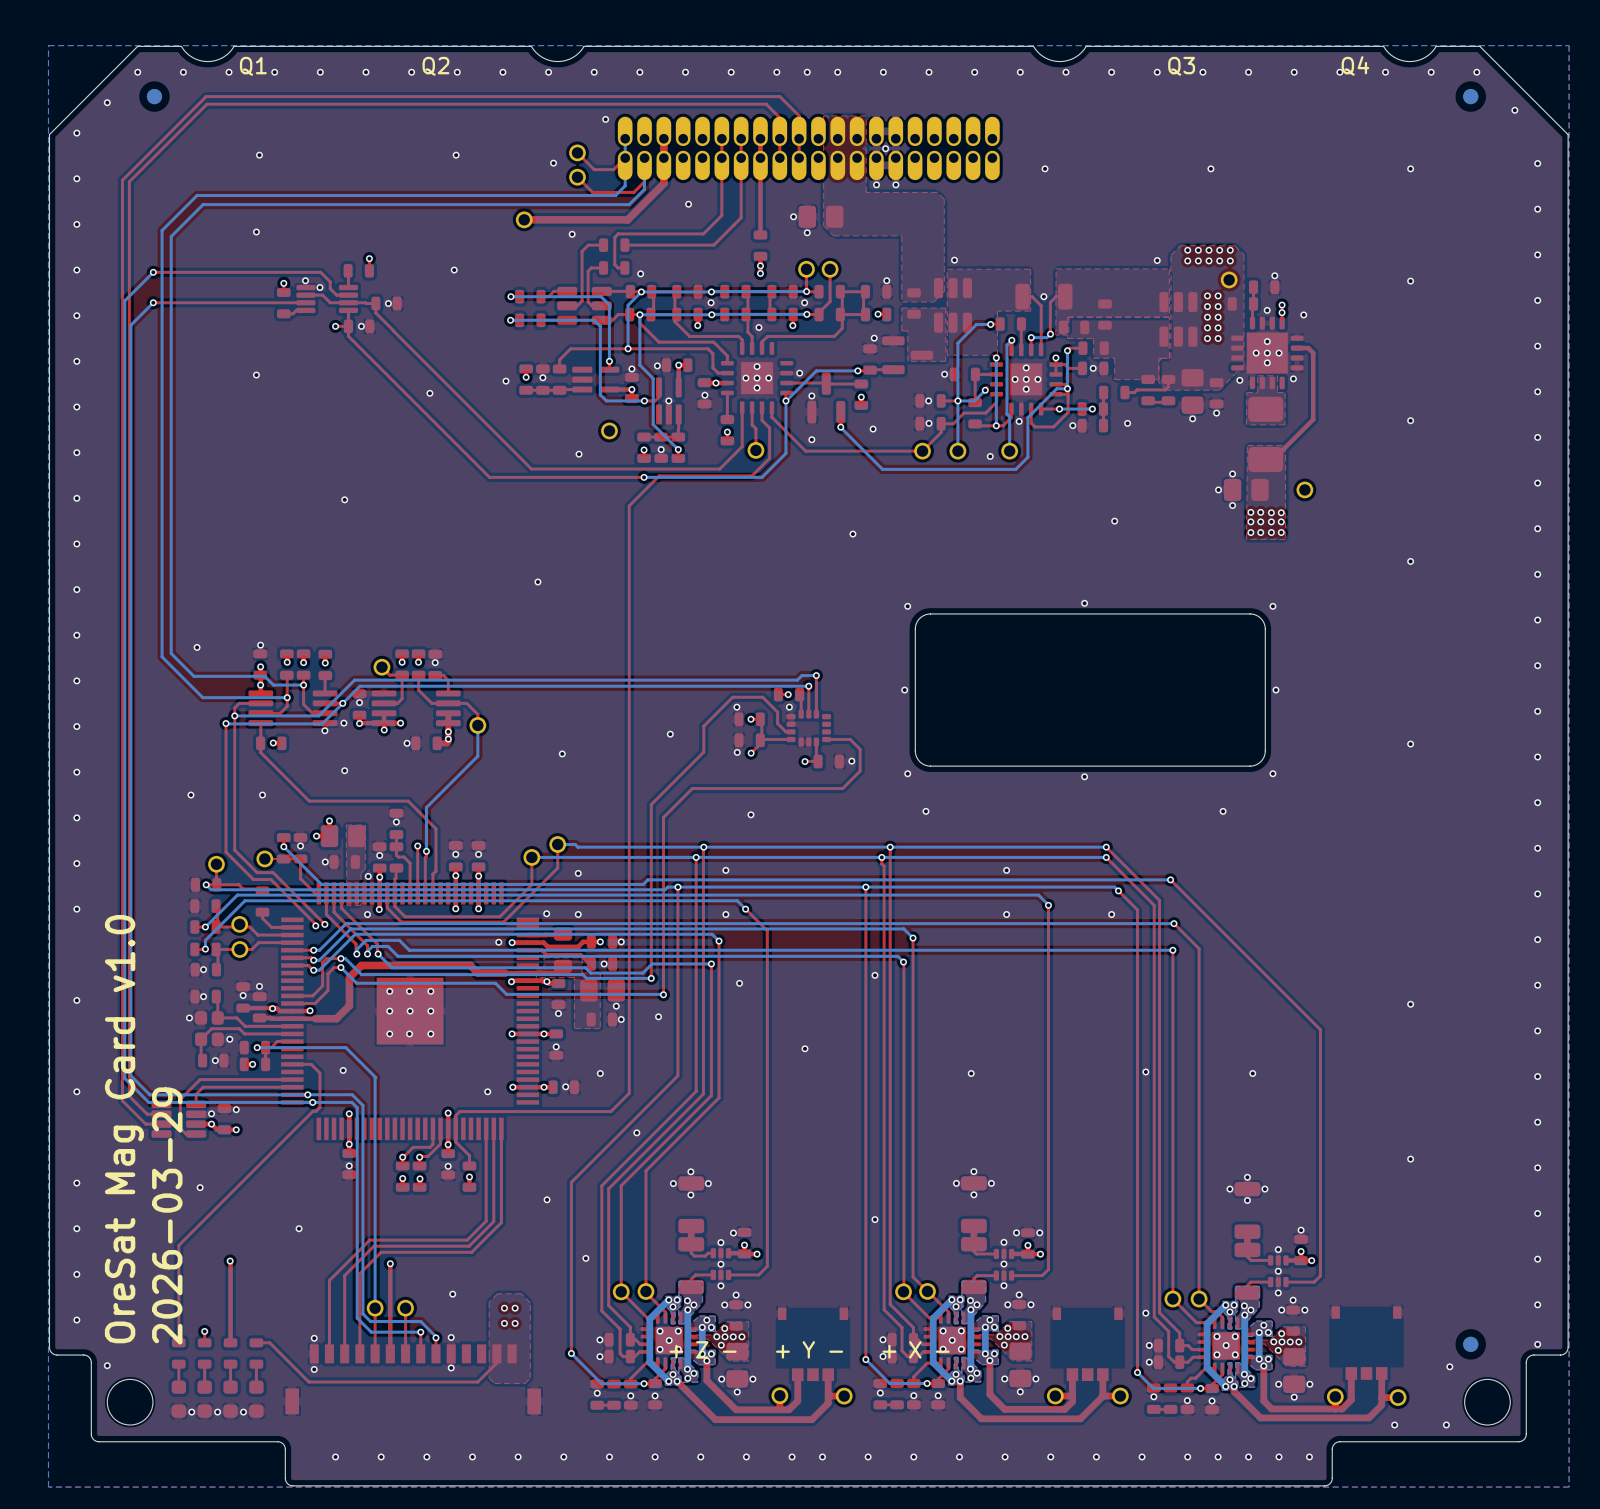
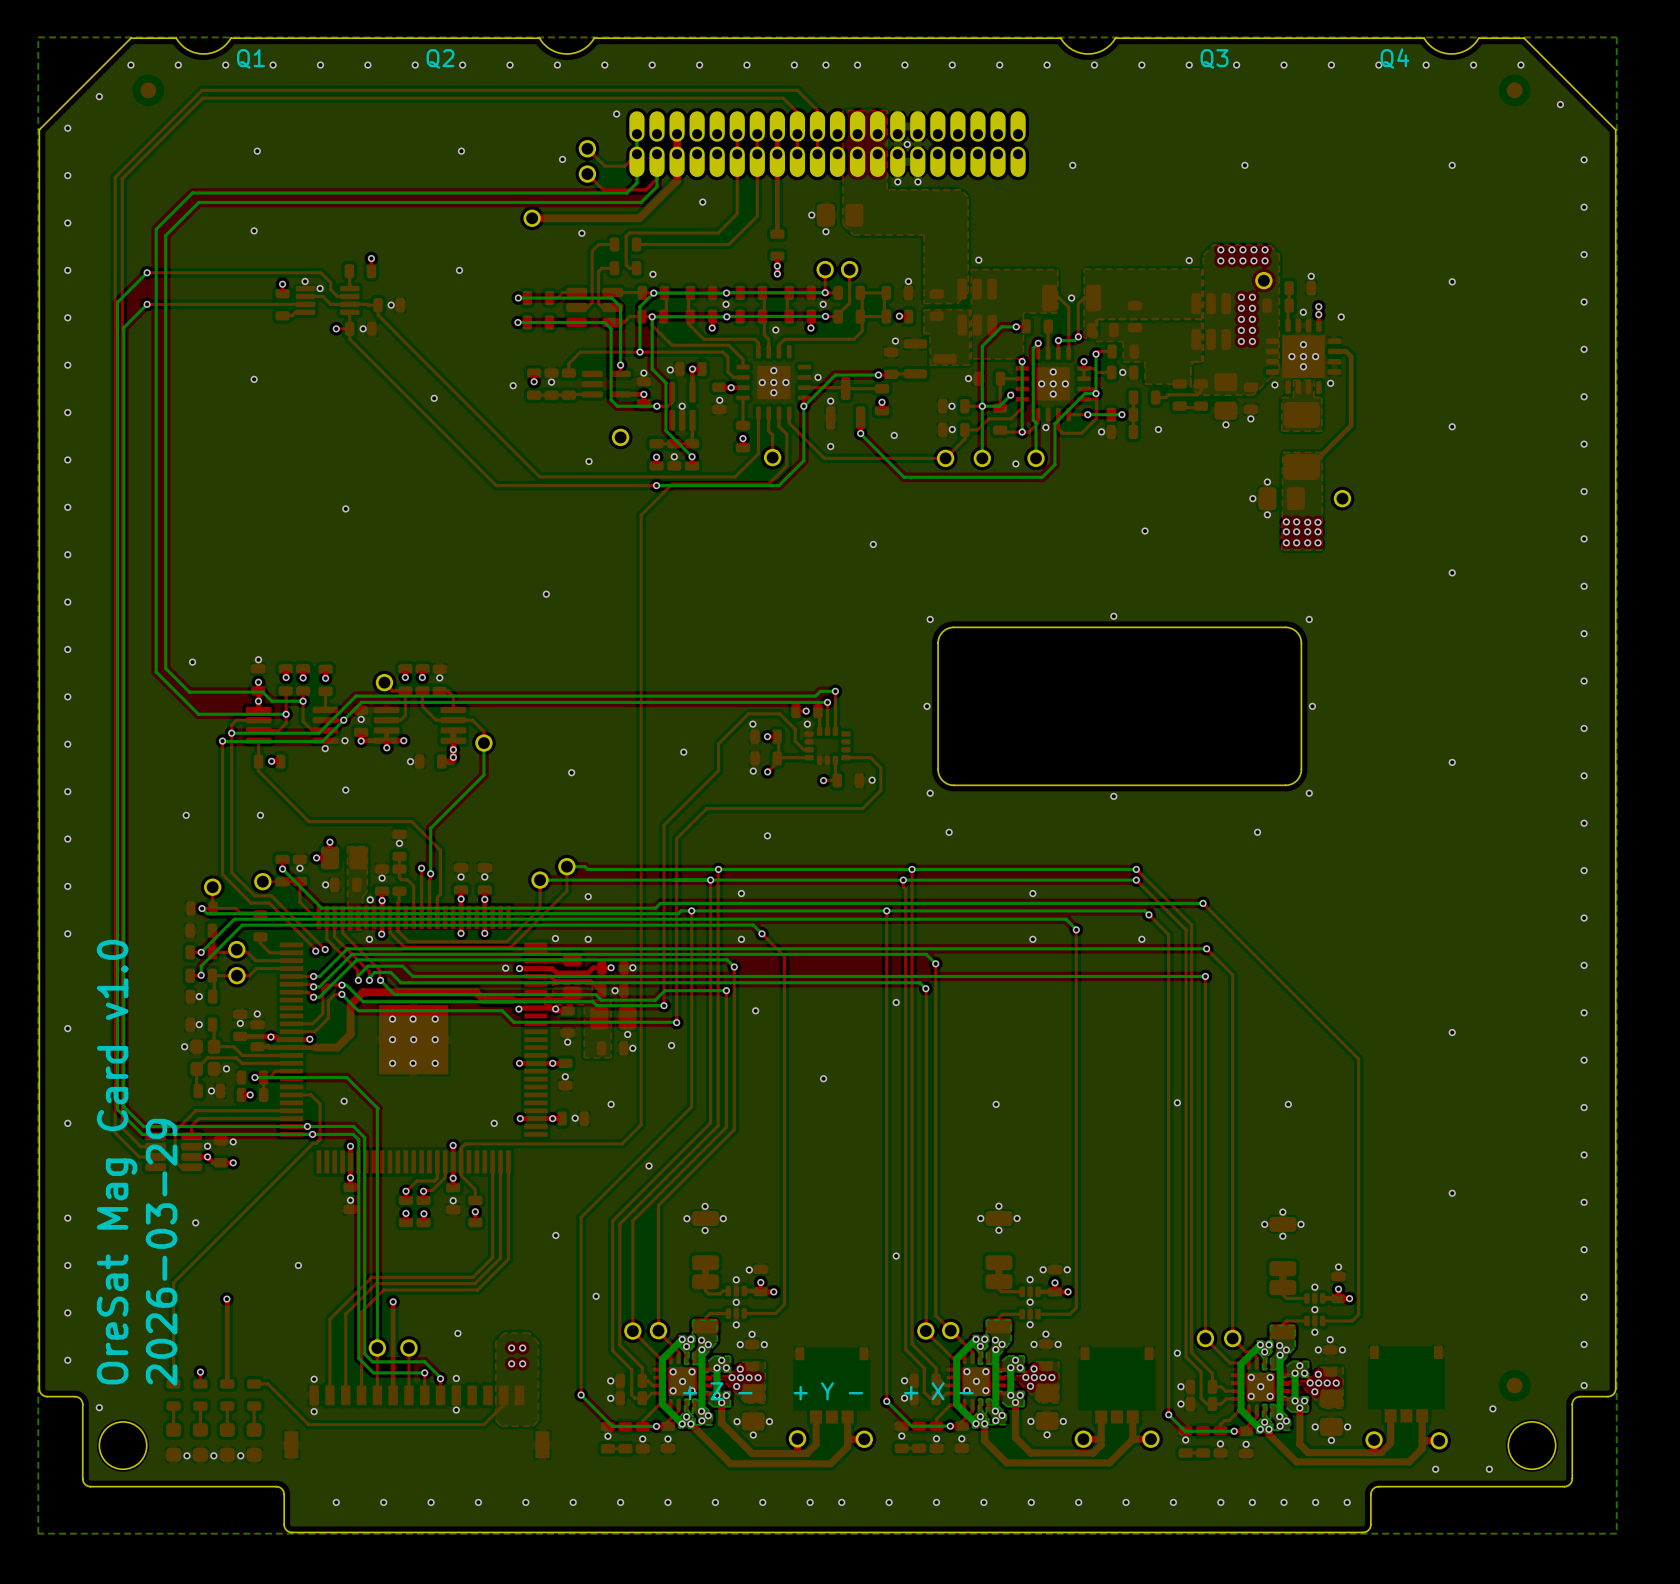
part: (154, 96) -> none
part: (1470, 96) -> none
part: (1470, 1344) -> none

